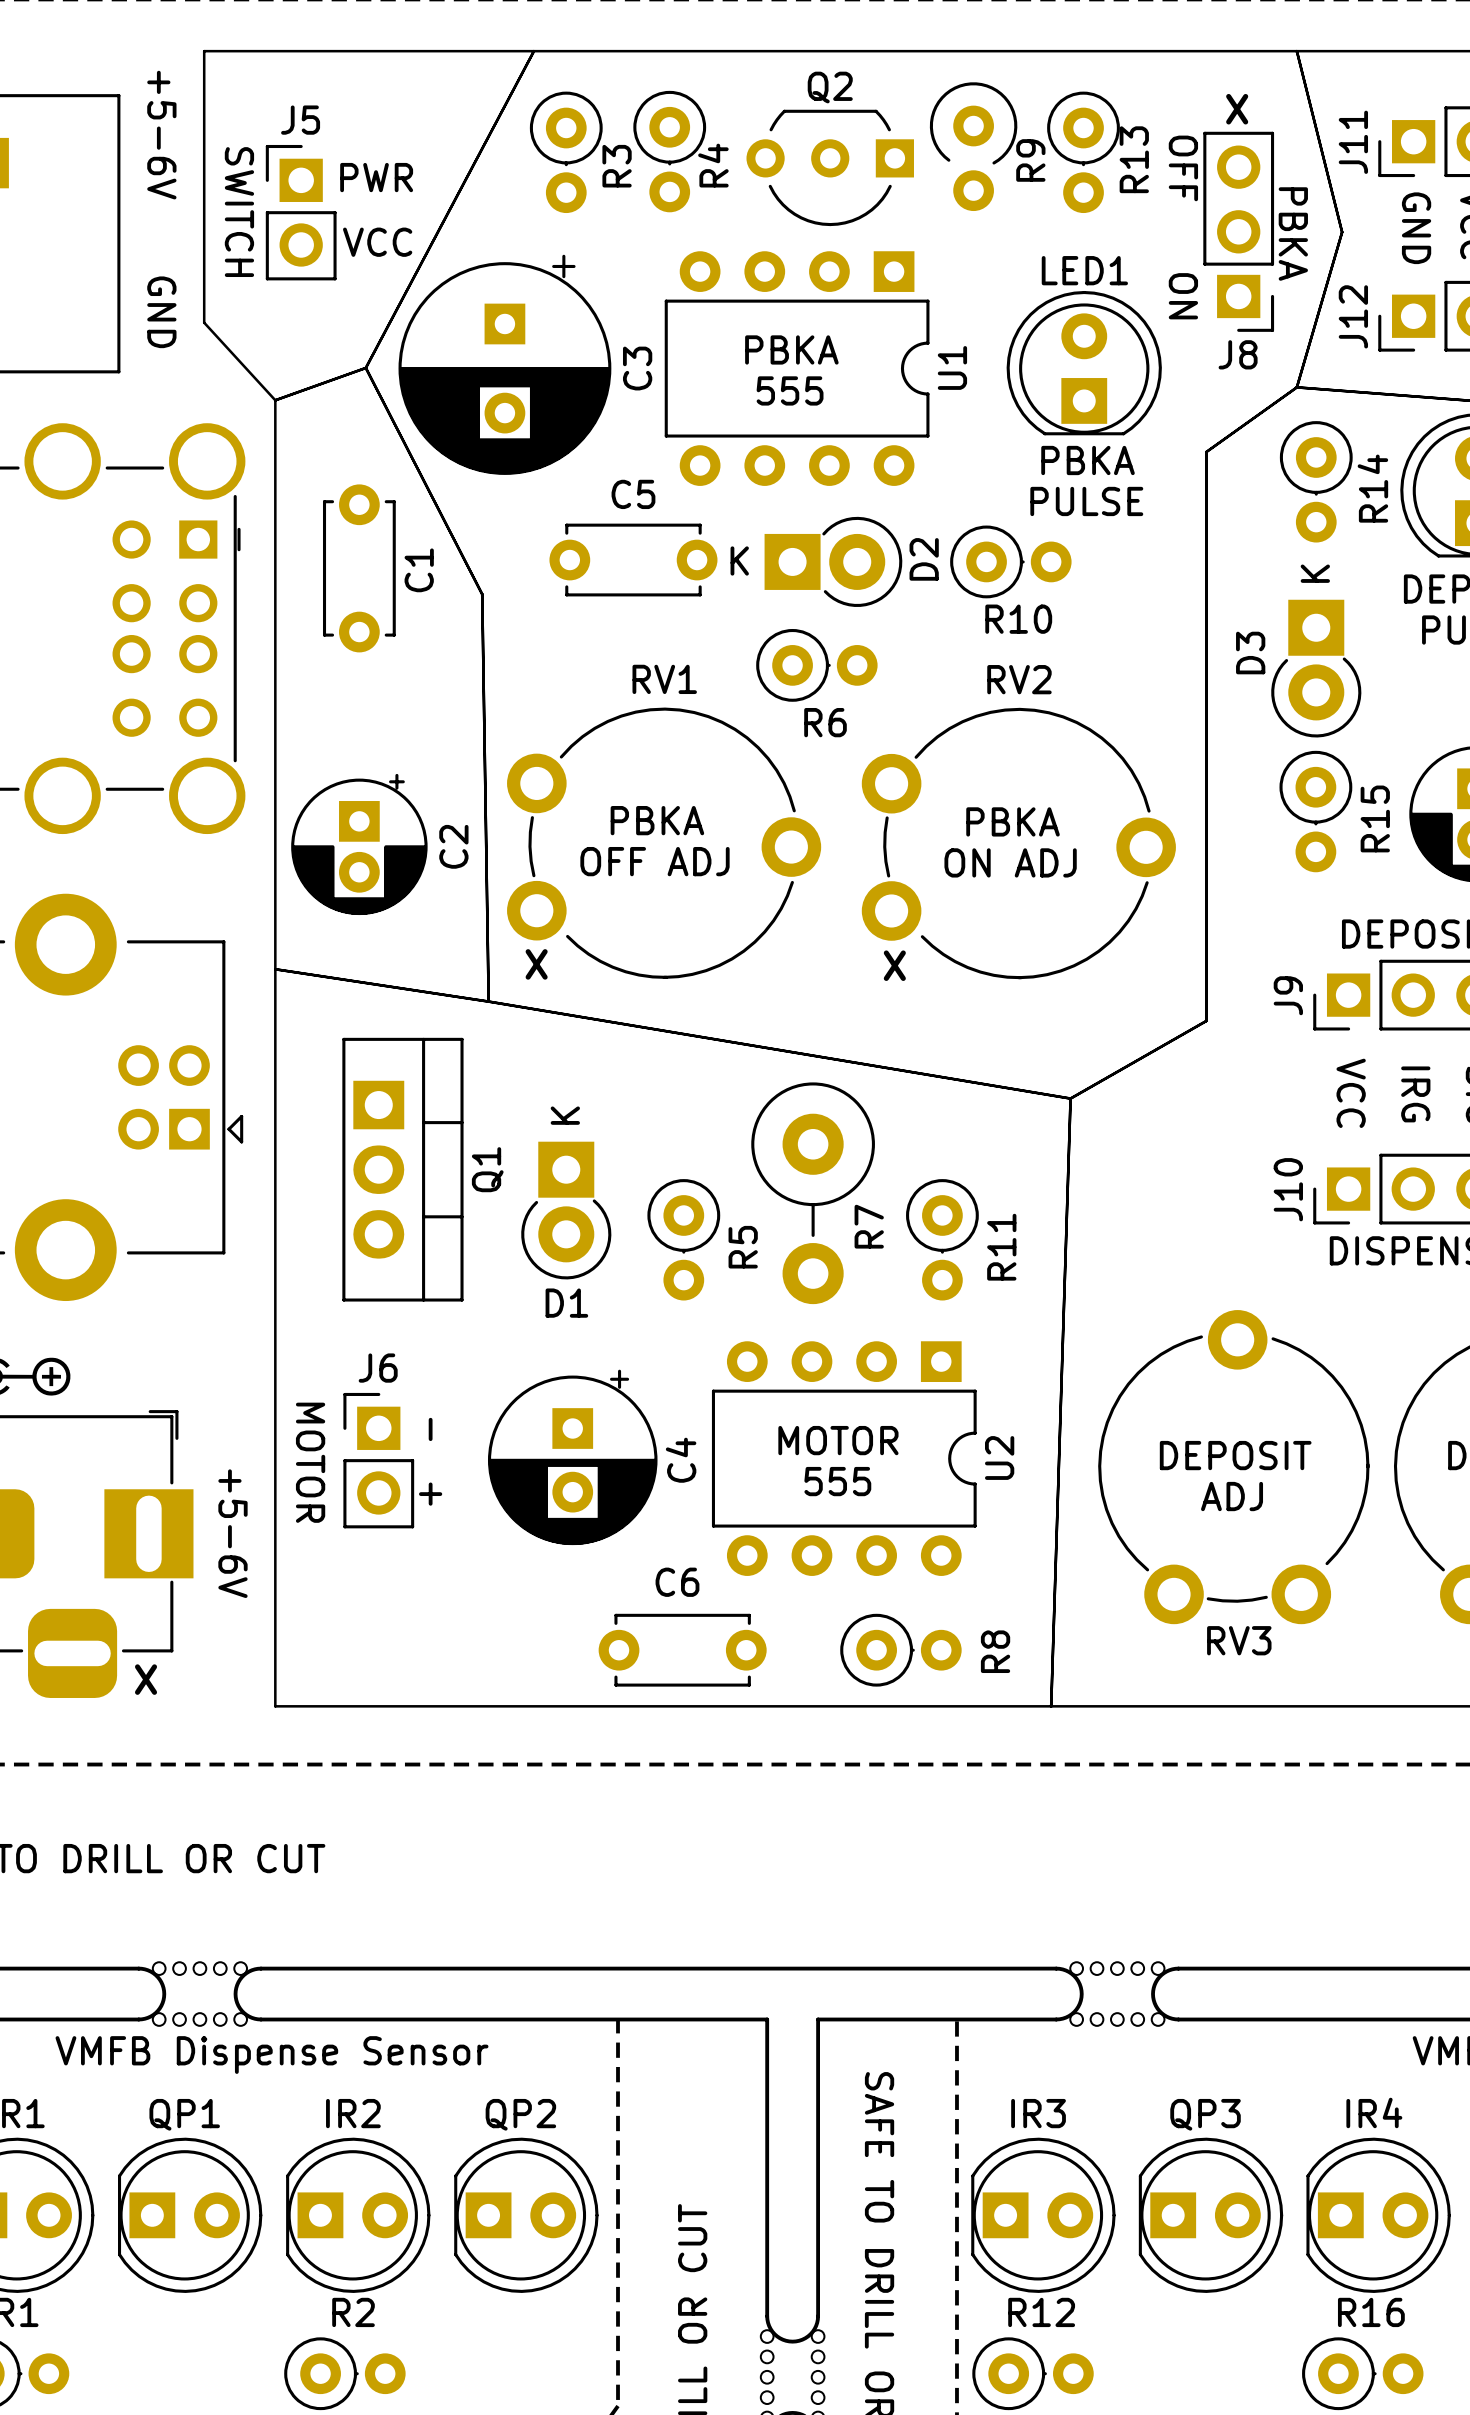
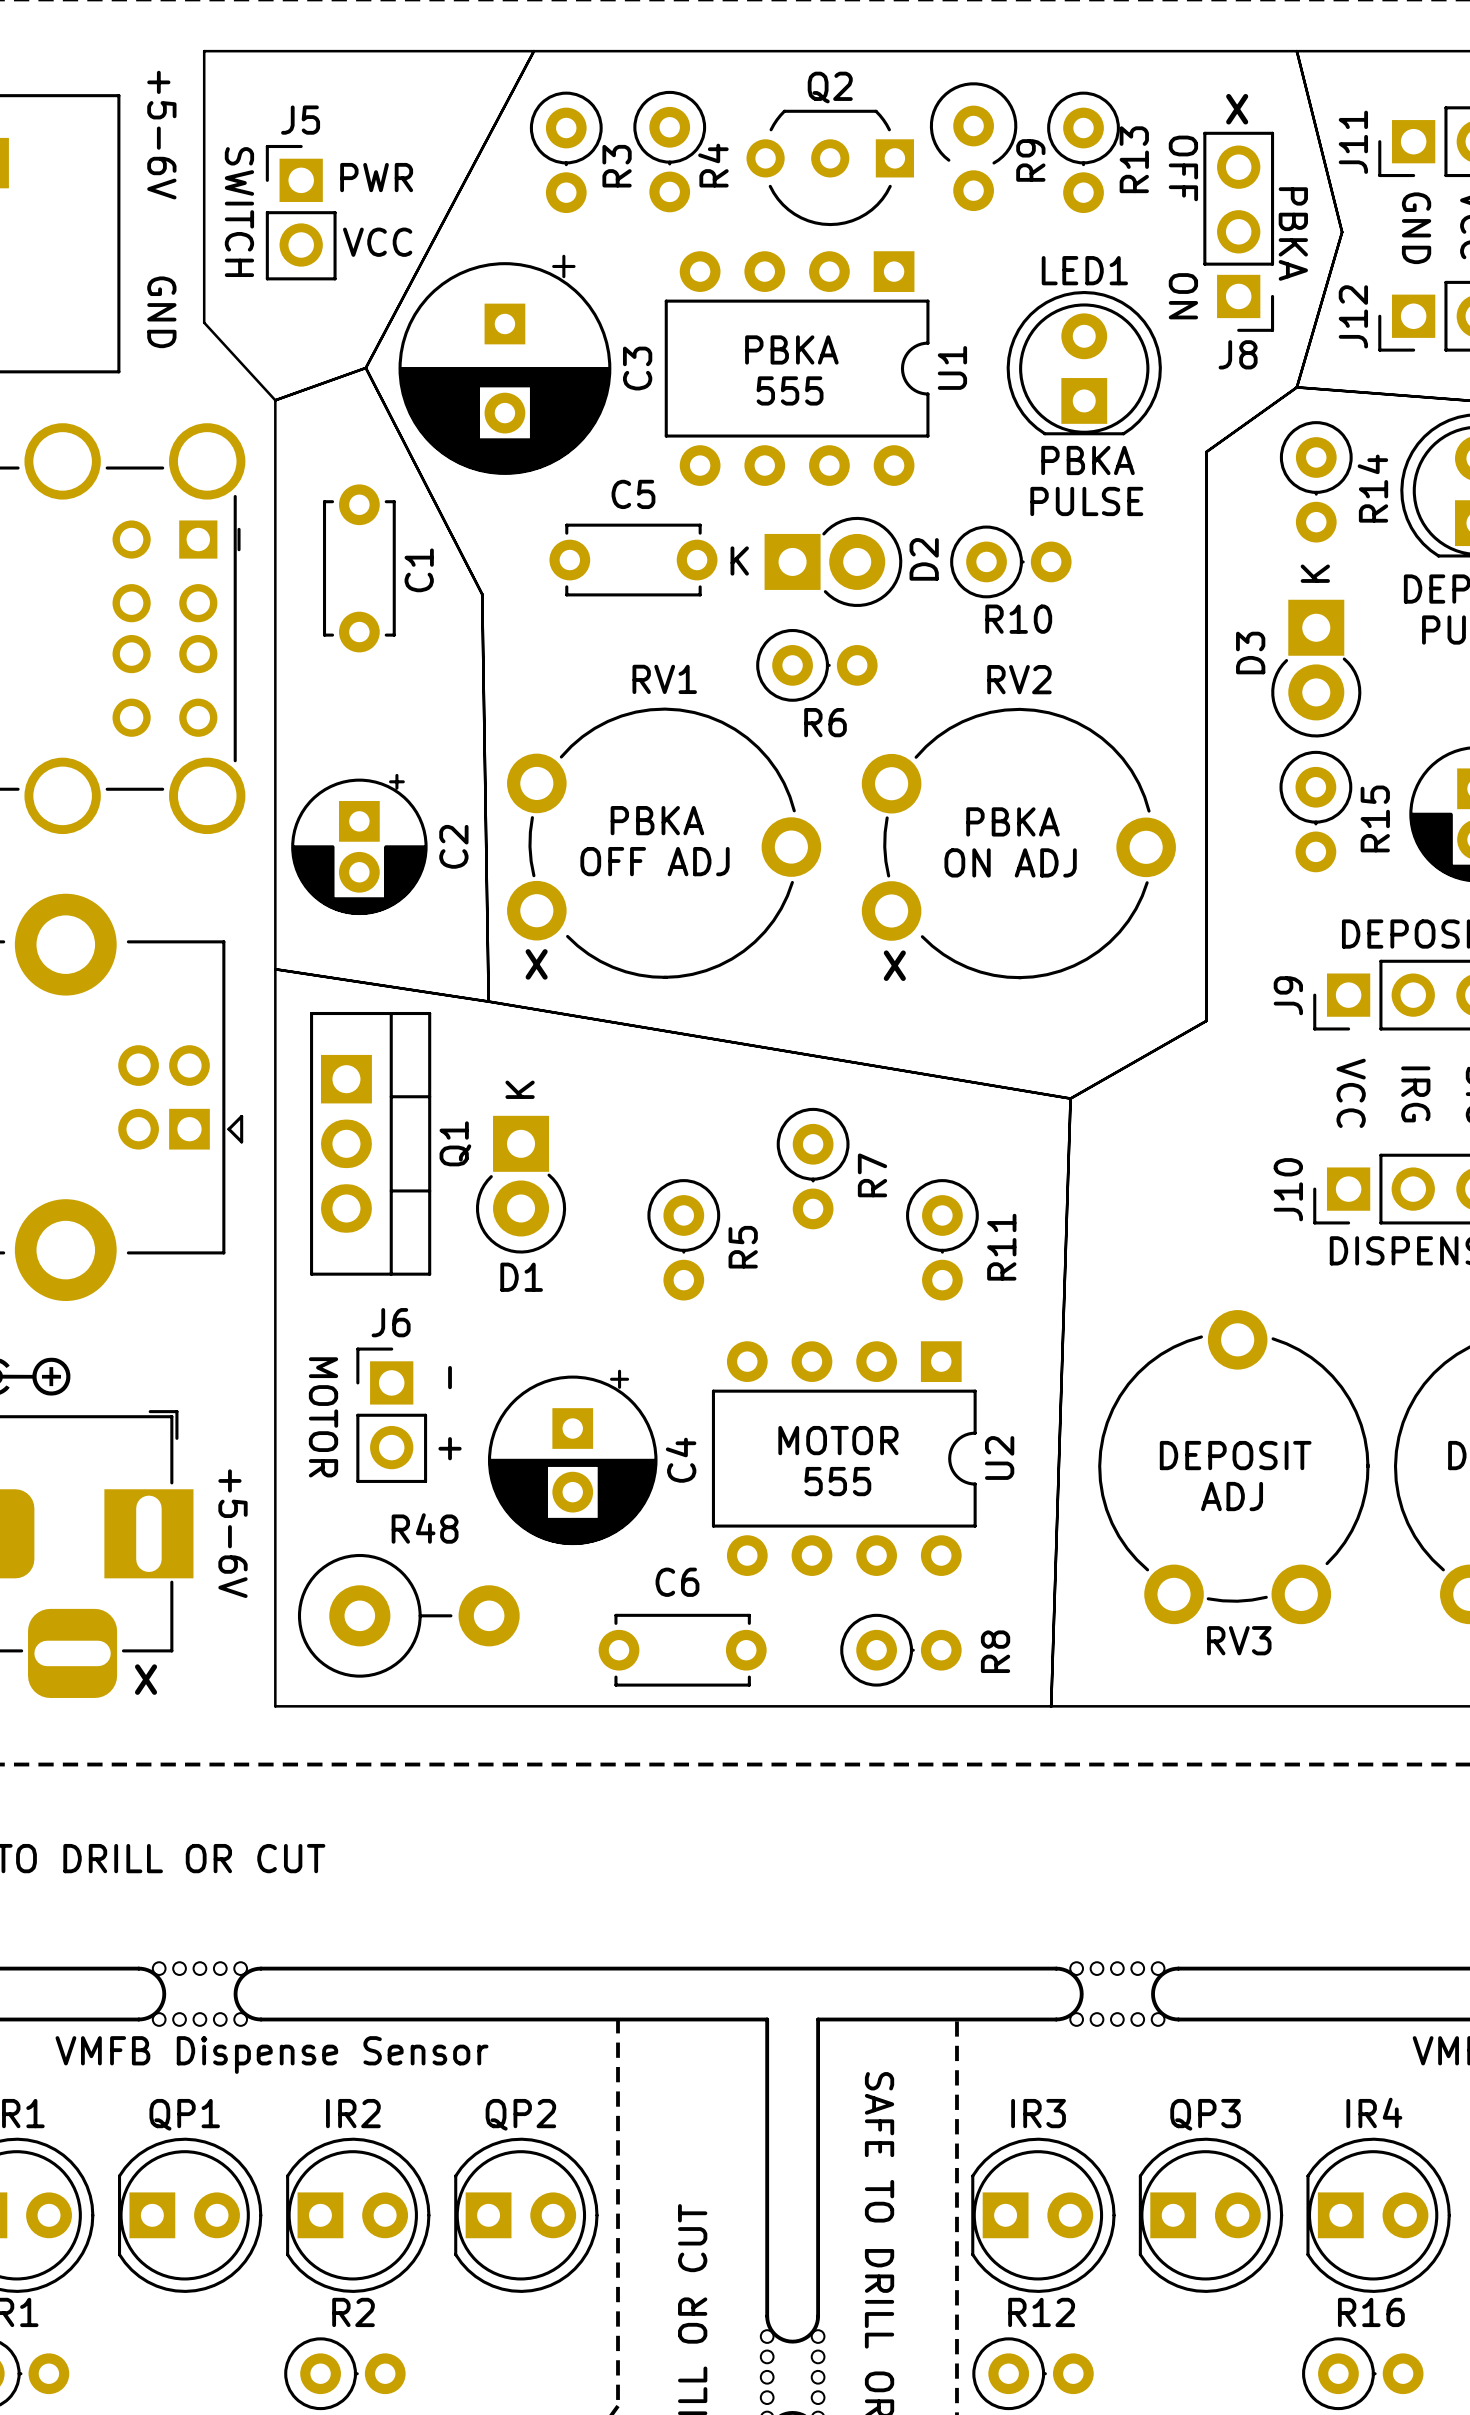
R7 footprint: [751, 1082, 875, 1305] -> [776, 1107, 850, 1230]
Q1 position: (402, 1169) -> (370, 1143)
D1 position: (566, 1210) -> (521, 1184)
text position: - (430, 1429) -> - (450, 1377)
J6 position: (378, 1460) -> (391, 1415)
text position: MOTOR (310, 1462) -> MOTOR (323, 1417)
text position: + (430, 1494) -> + (450, 1448)
R48: none -> (408, 1615)

